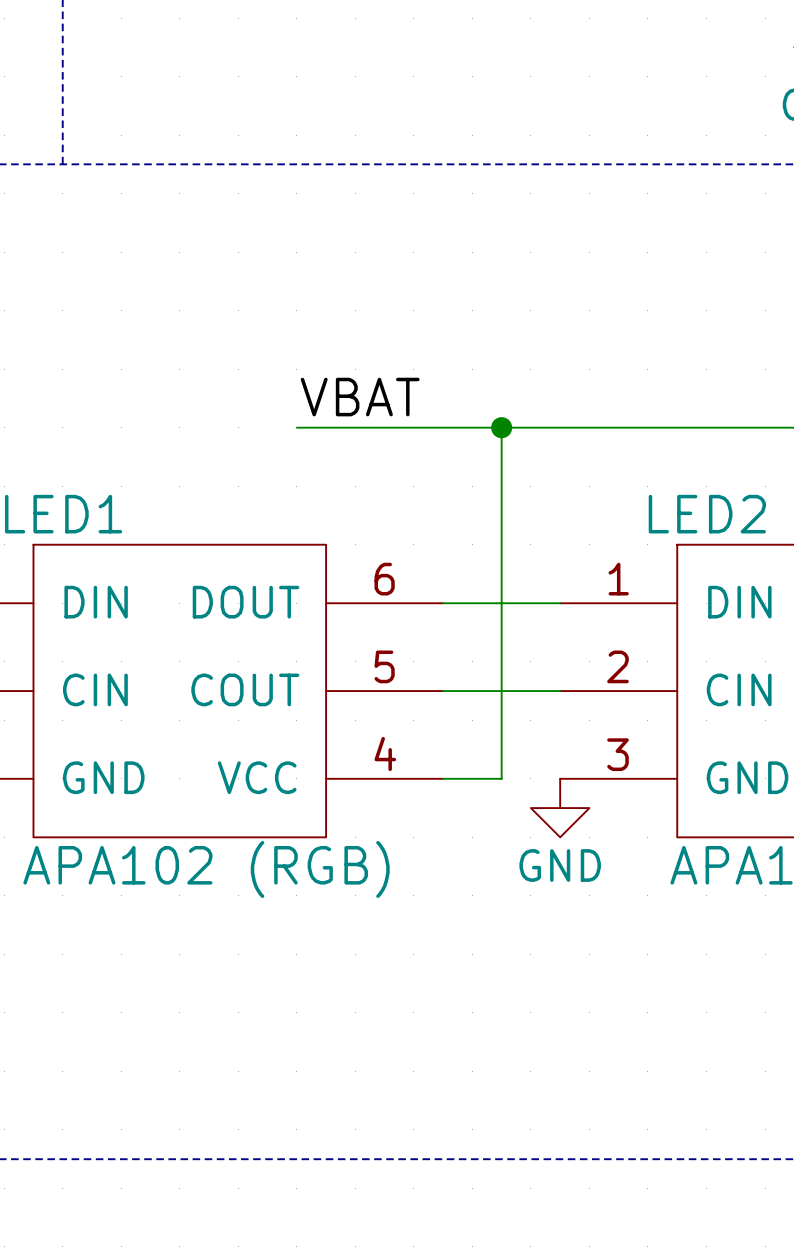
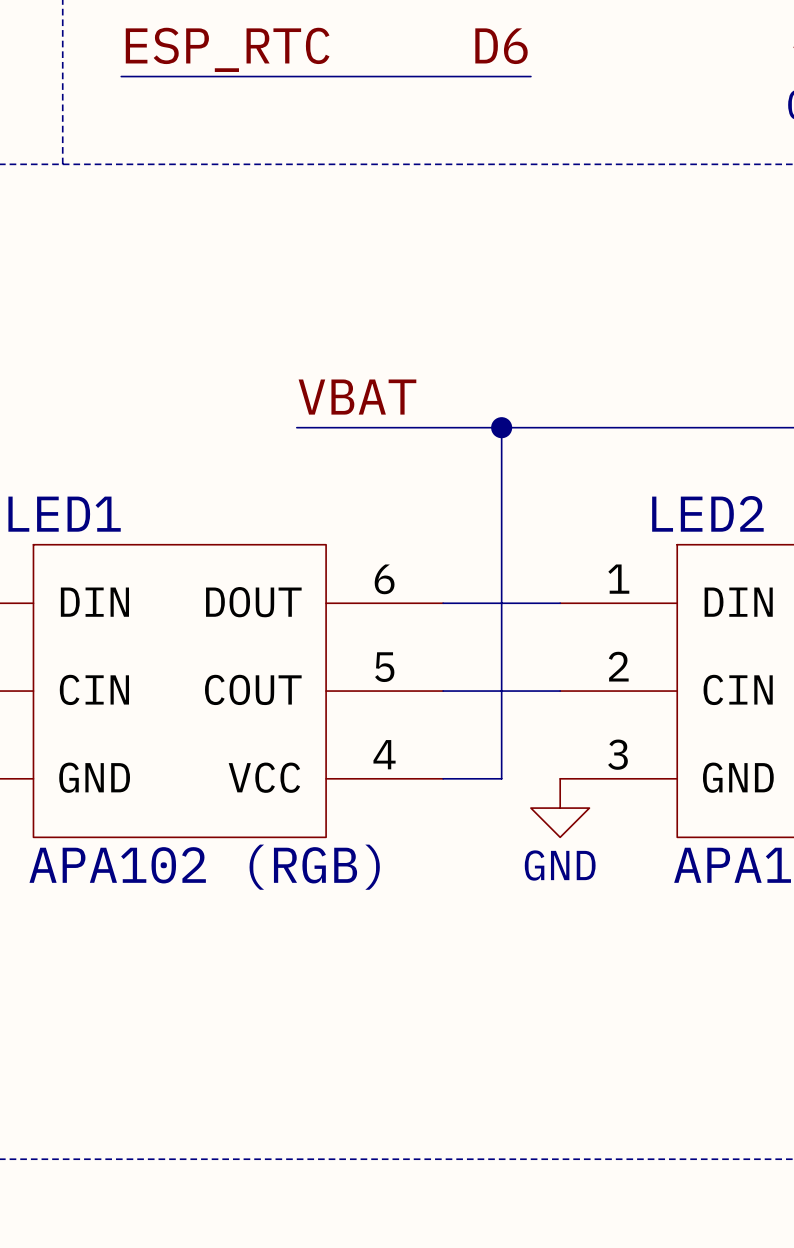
label: none -> D6 (501, 46)
label: none -> ESP_RTC (227, 49)
wire: none -> (121, 76) (530, 76)

